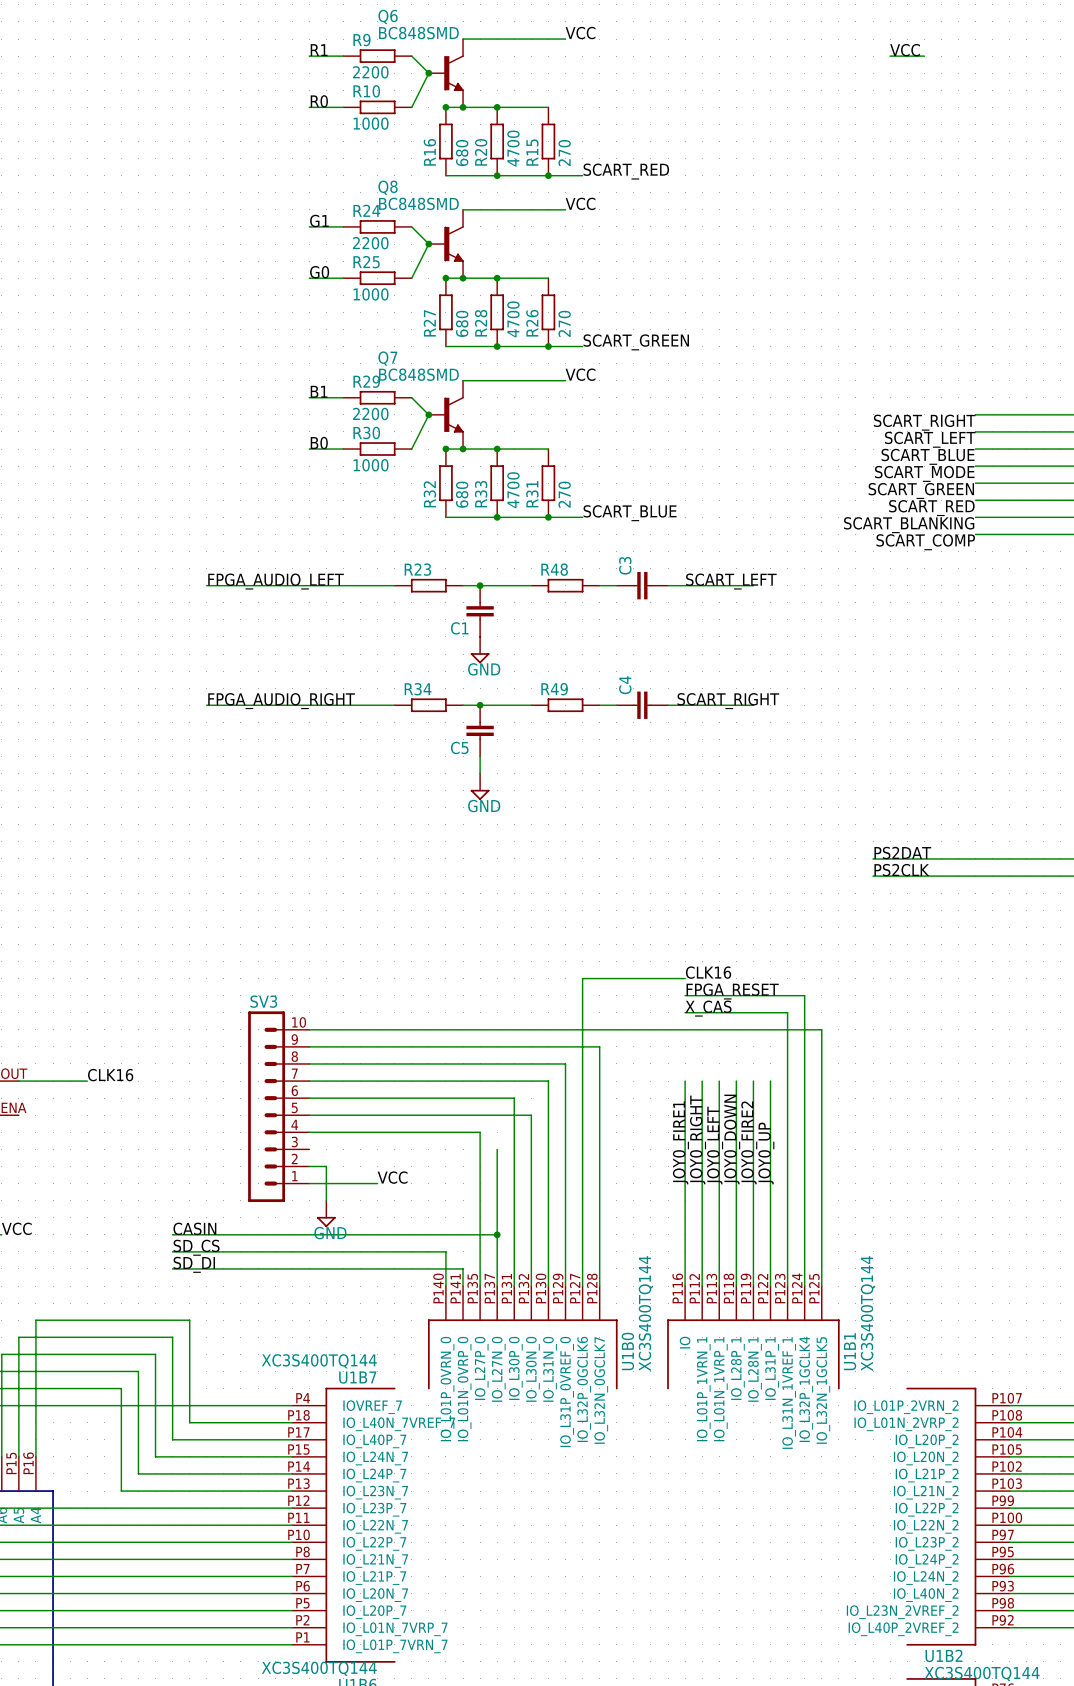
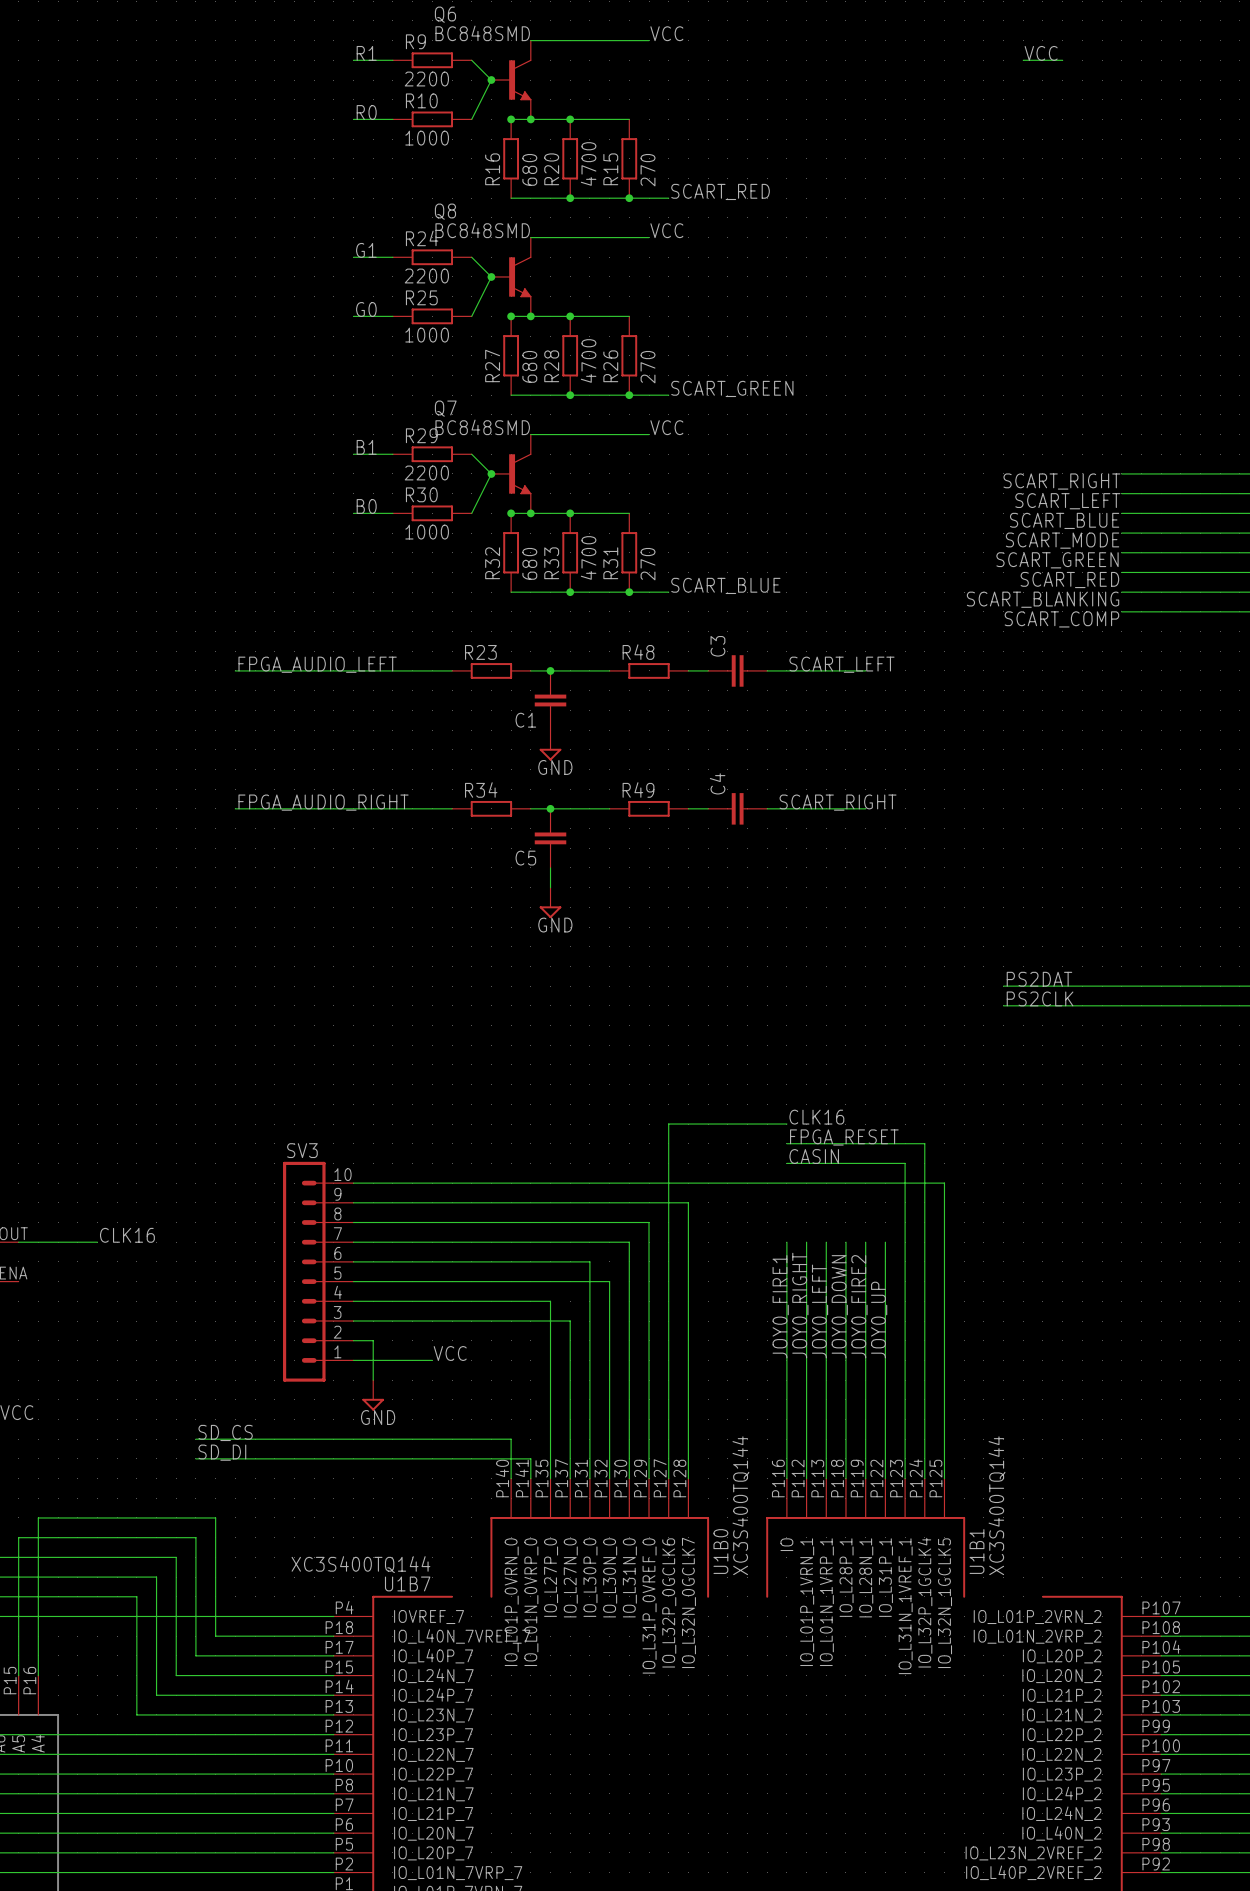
label: X_CAS (708, 1008) -> CASIN (814, 1156)
wire: none -> (353, 1321) (570, 1321)
label: CASIN (194, 1228) -> none
wire: (172, 1234) (497, 1234) -> none
junction: (497, 1234) -> none

